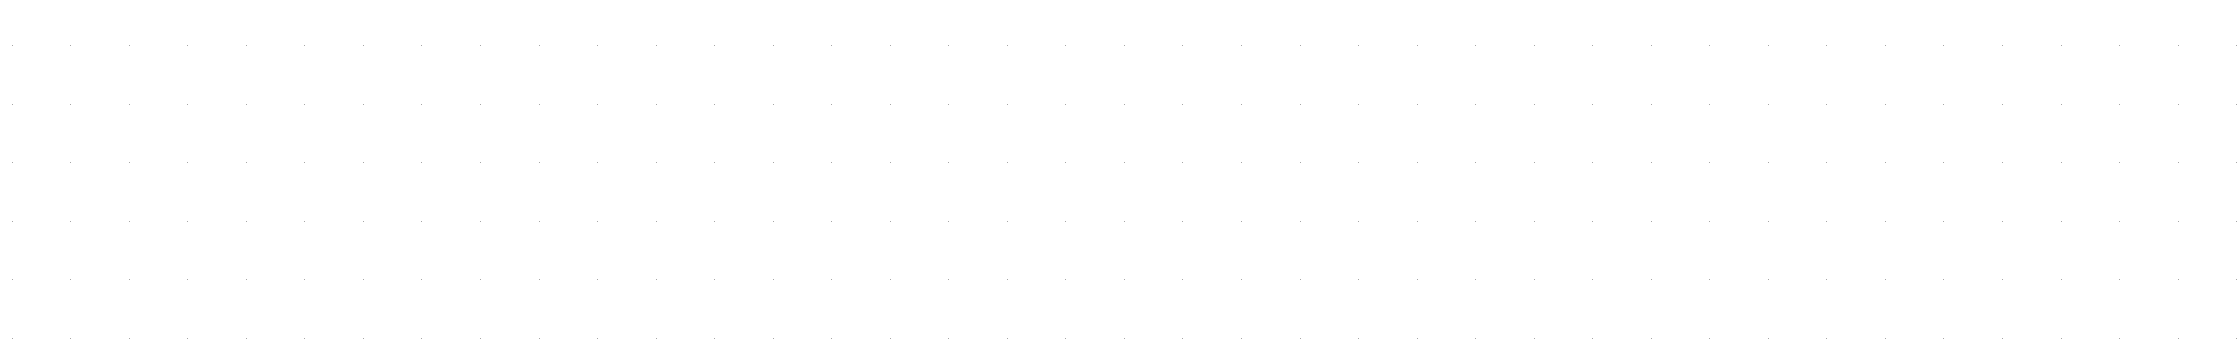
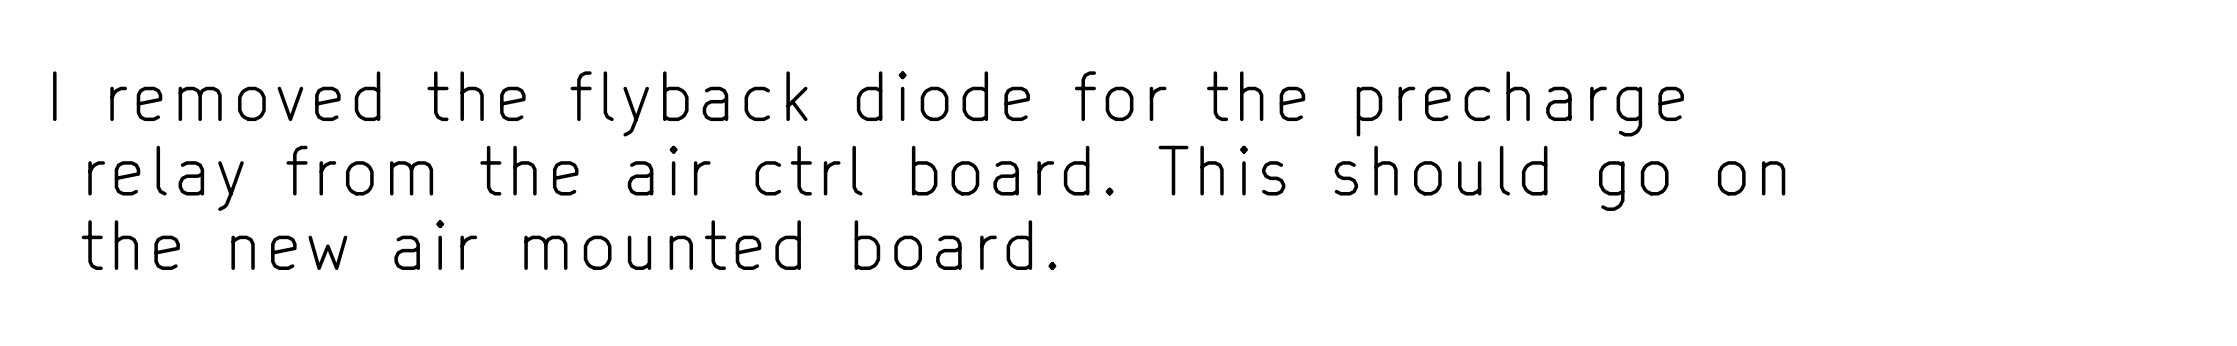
text: none -> I removed the flyback diode for the precharge (868, 103)
text: none -> relay from the air ctrl board. This should go on (936, 178)
text: none -> the new air mounted board. (569, 245)

